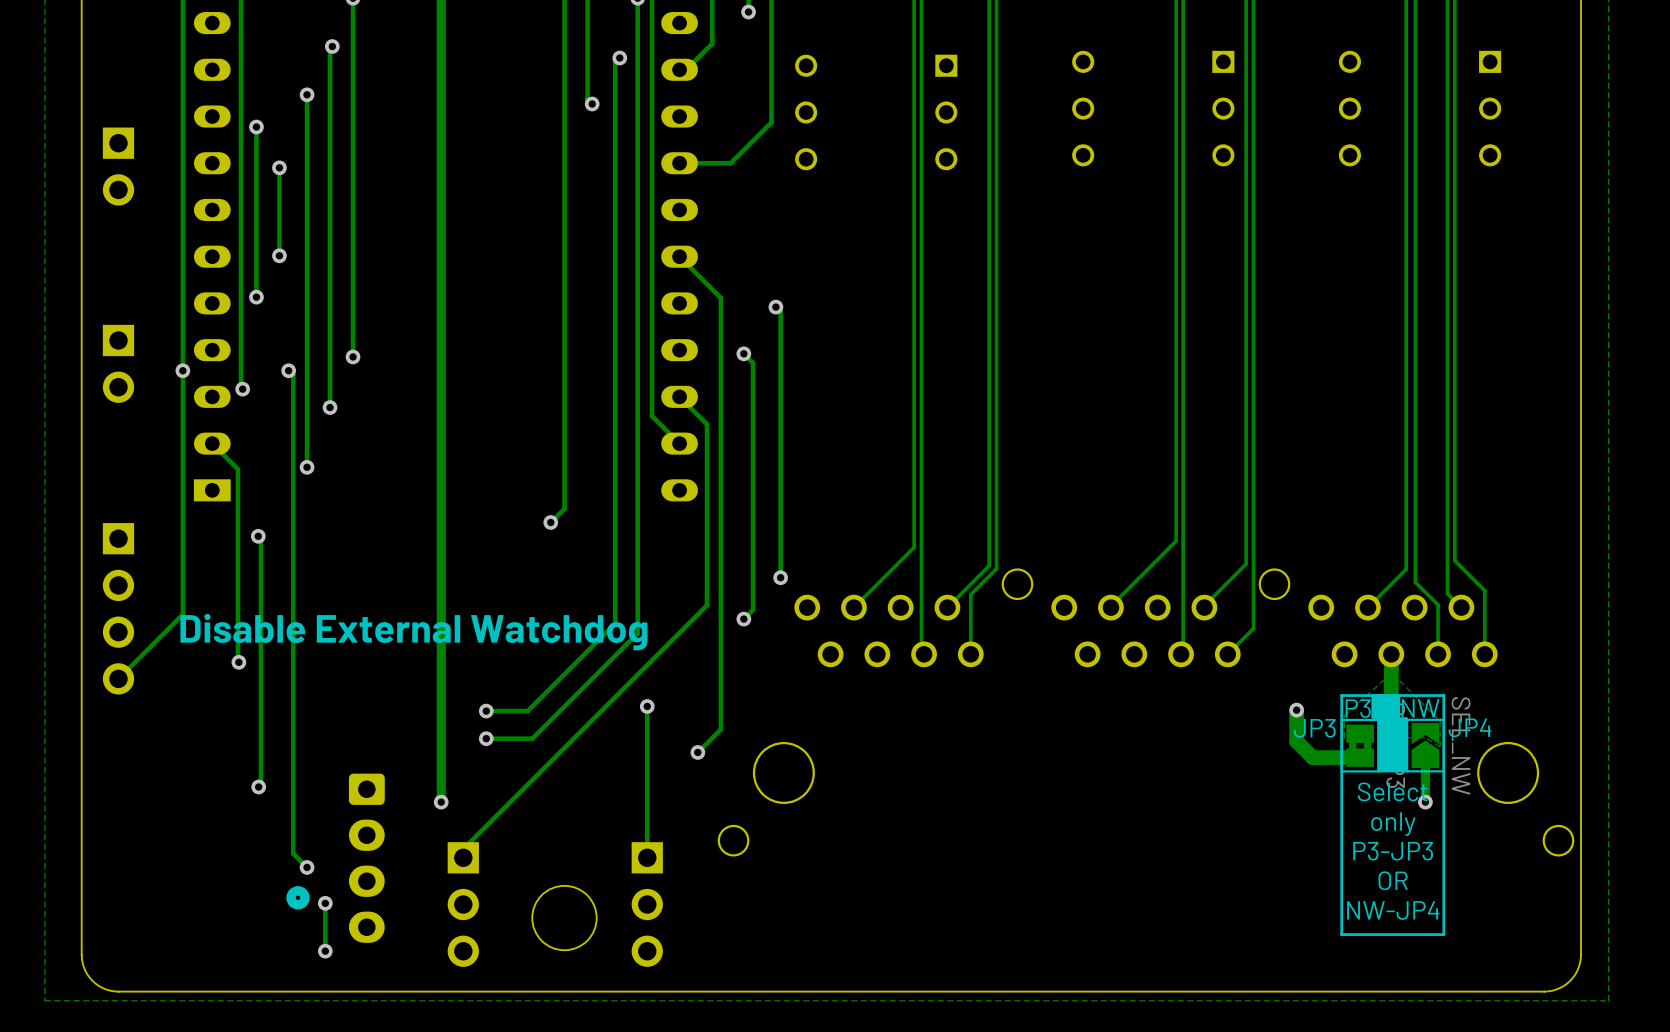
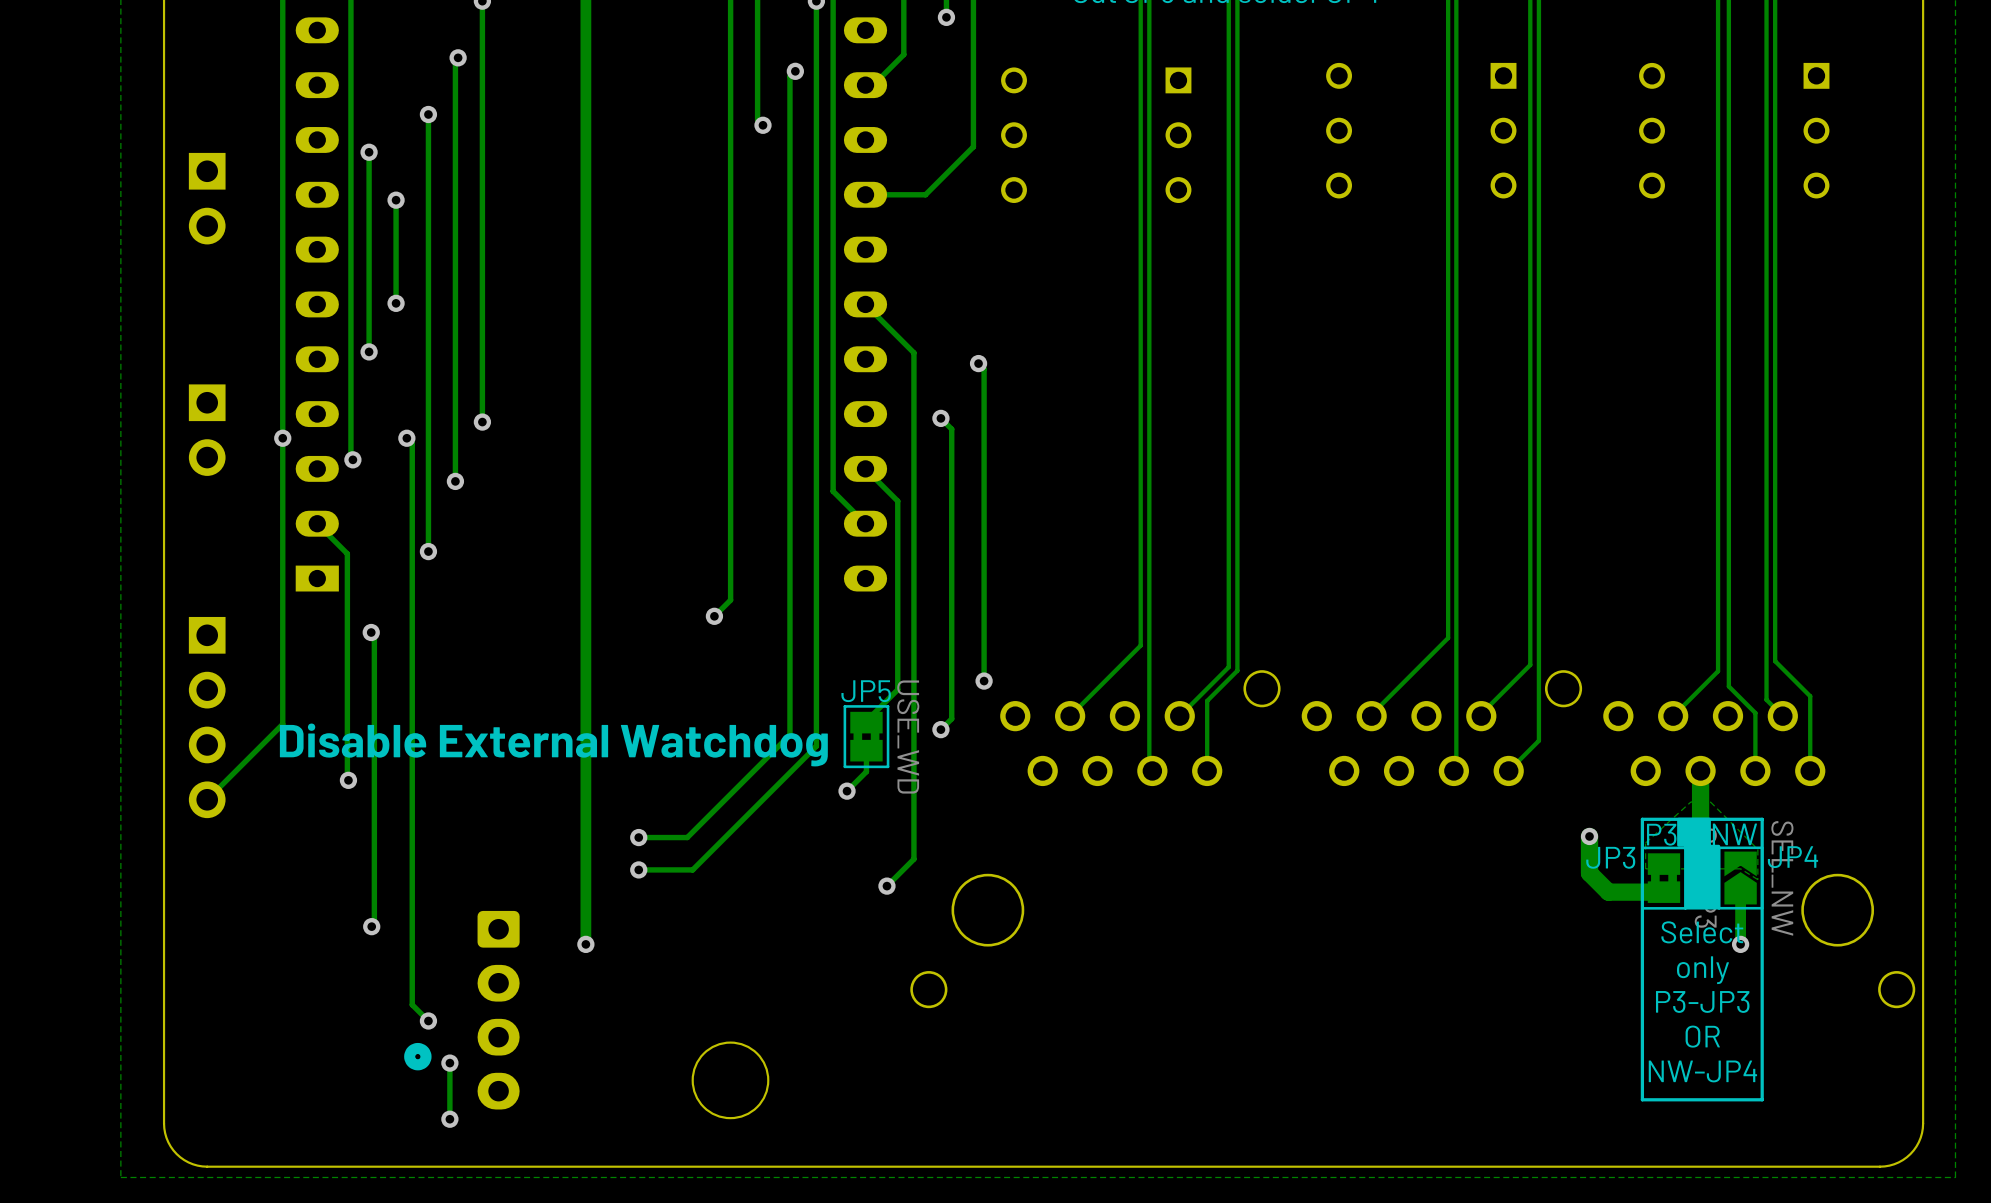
track: (707, 585) (707, 605) (463, 849) (463, 857) -> (897, 689) (866, 720)
JP5: none -> USE_WD (866, 736)
track: none -> (866, 752) (866, 771) (847, 791)
track: (647, 706) (647, 857) -> none
via position: (647, 706) -> (847, 791)
part: (463, 904) -> none
part: (647, 904) -> none

